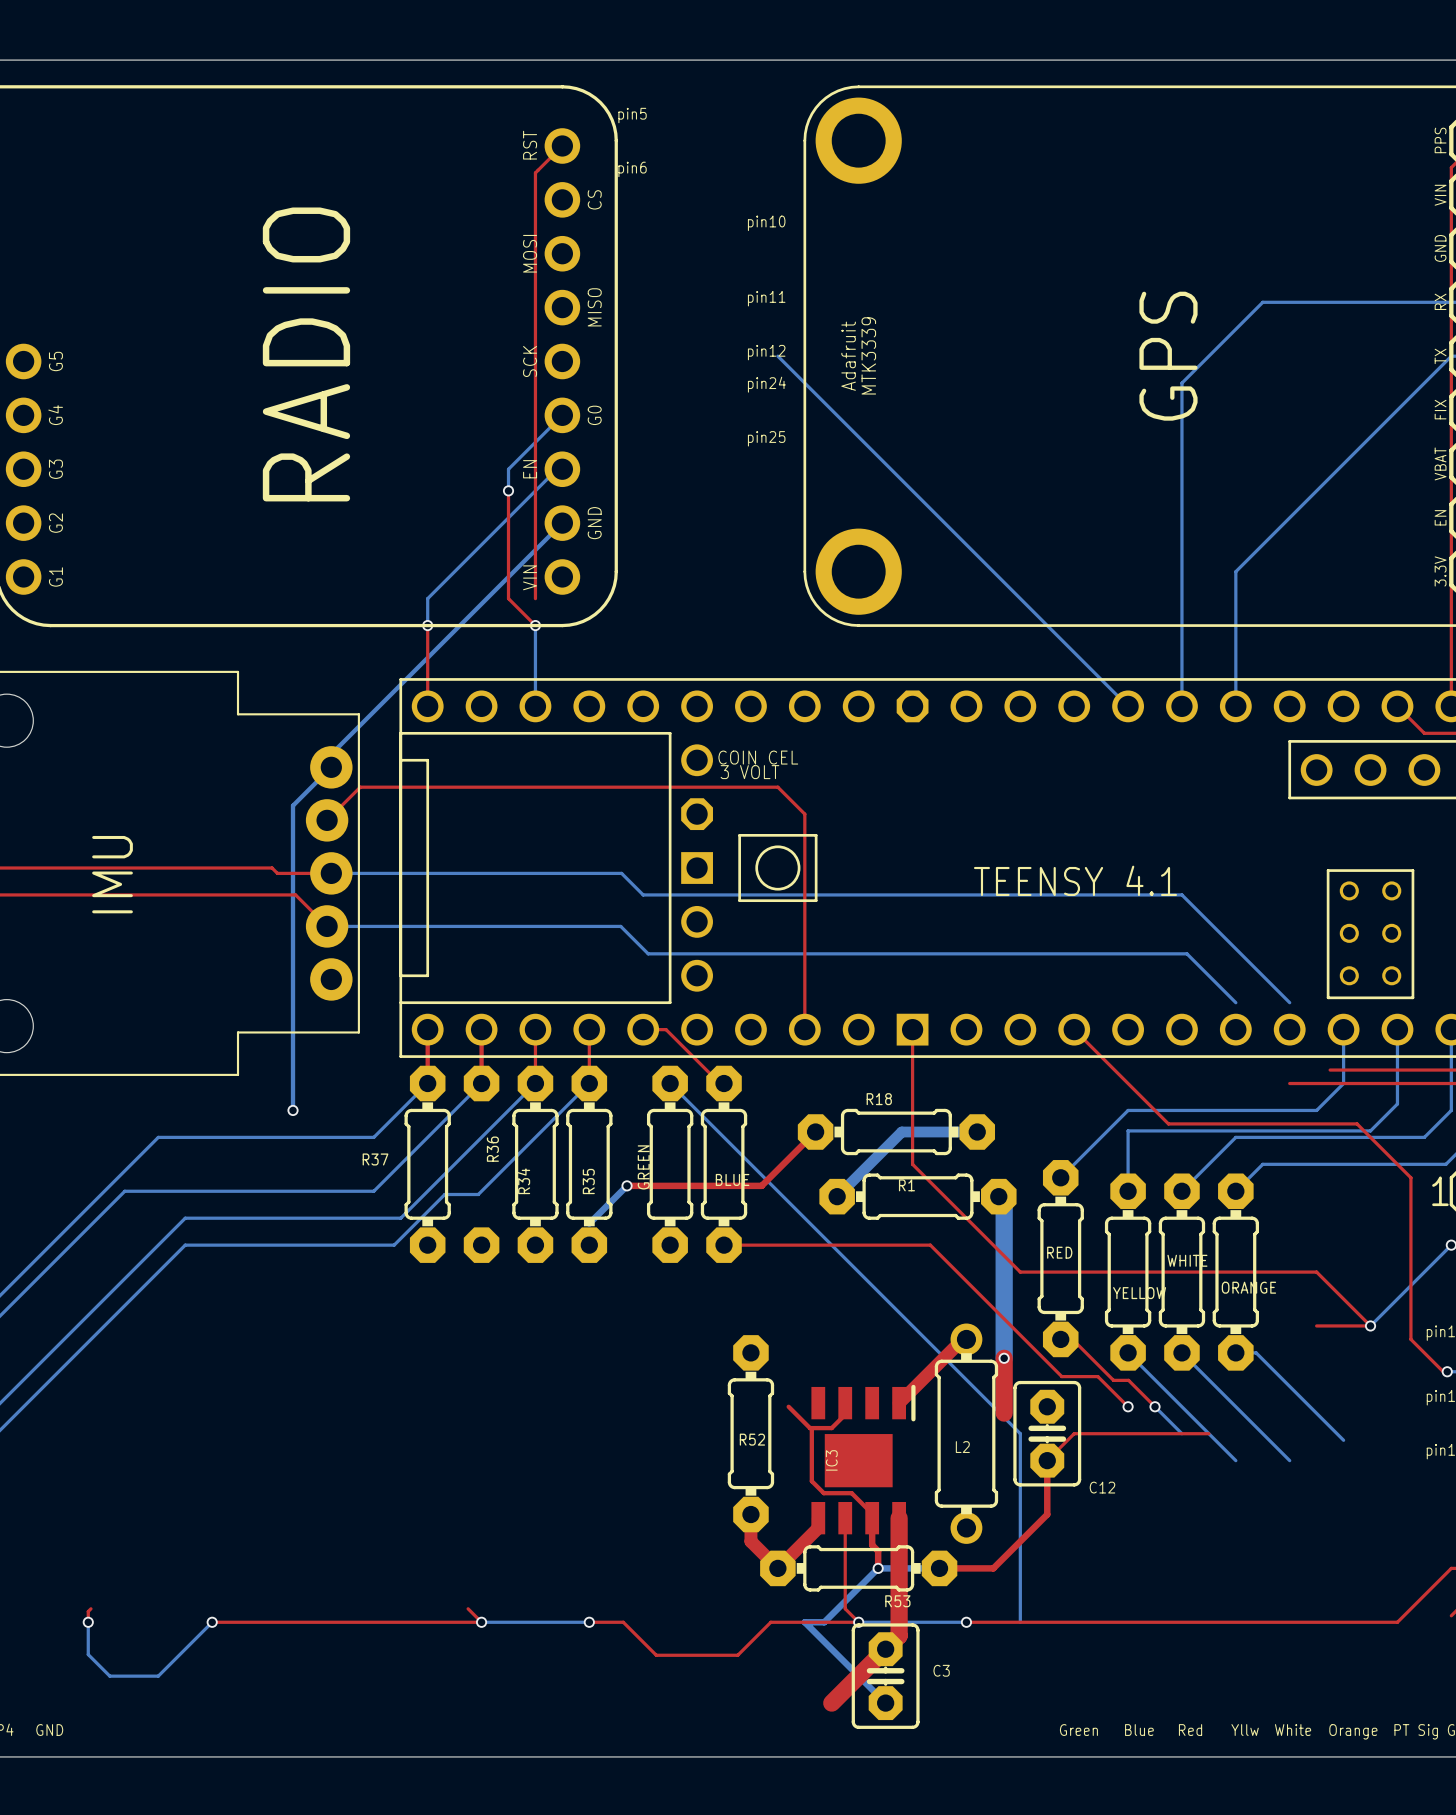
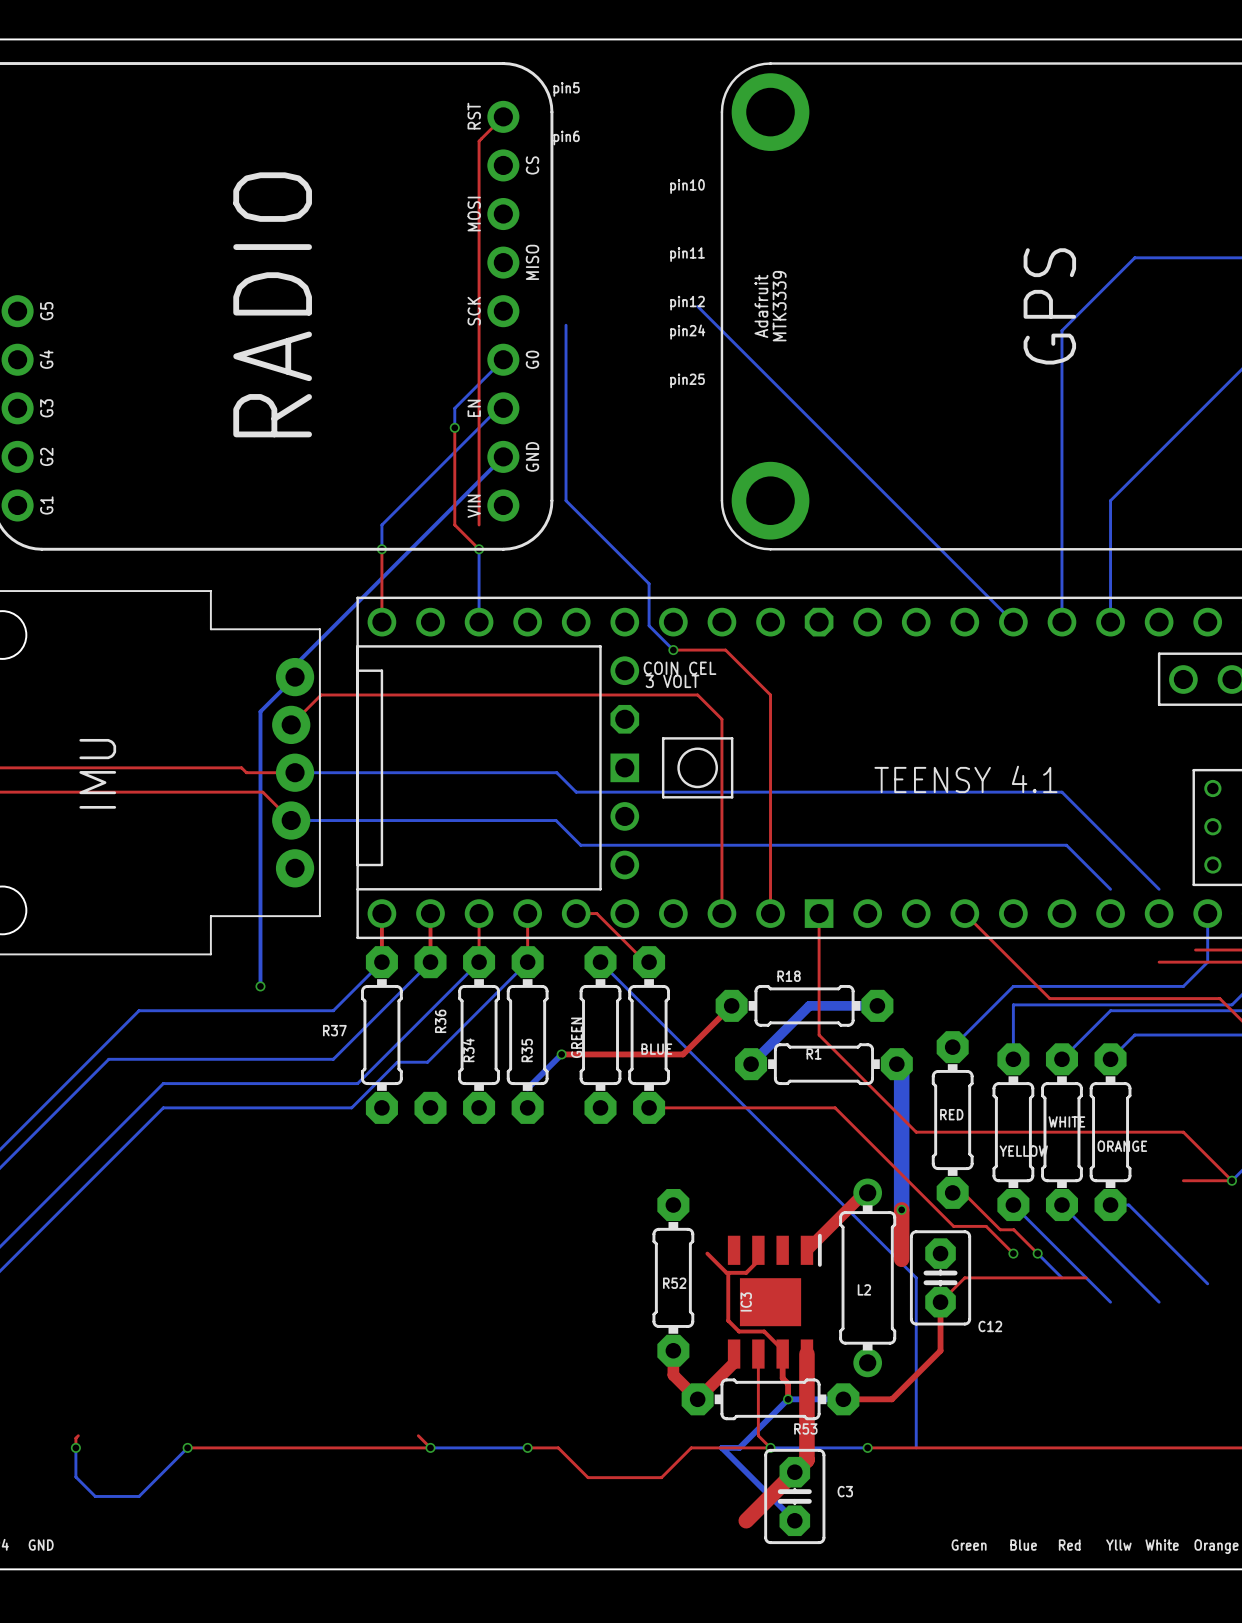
bottom track: none -> (566, 325) (566, 500) (649, 583) (649, 625) (673, 650)
top track: none -> (673, 650) (725, 650) (770, 694) (770, 913)
via: none -> (673, 650)

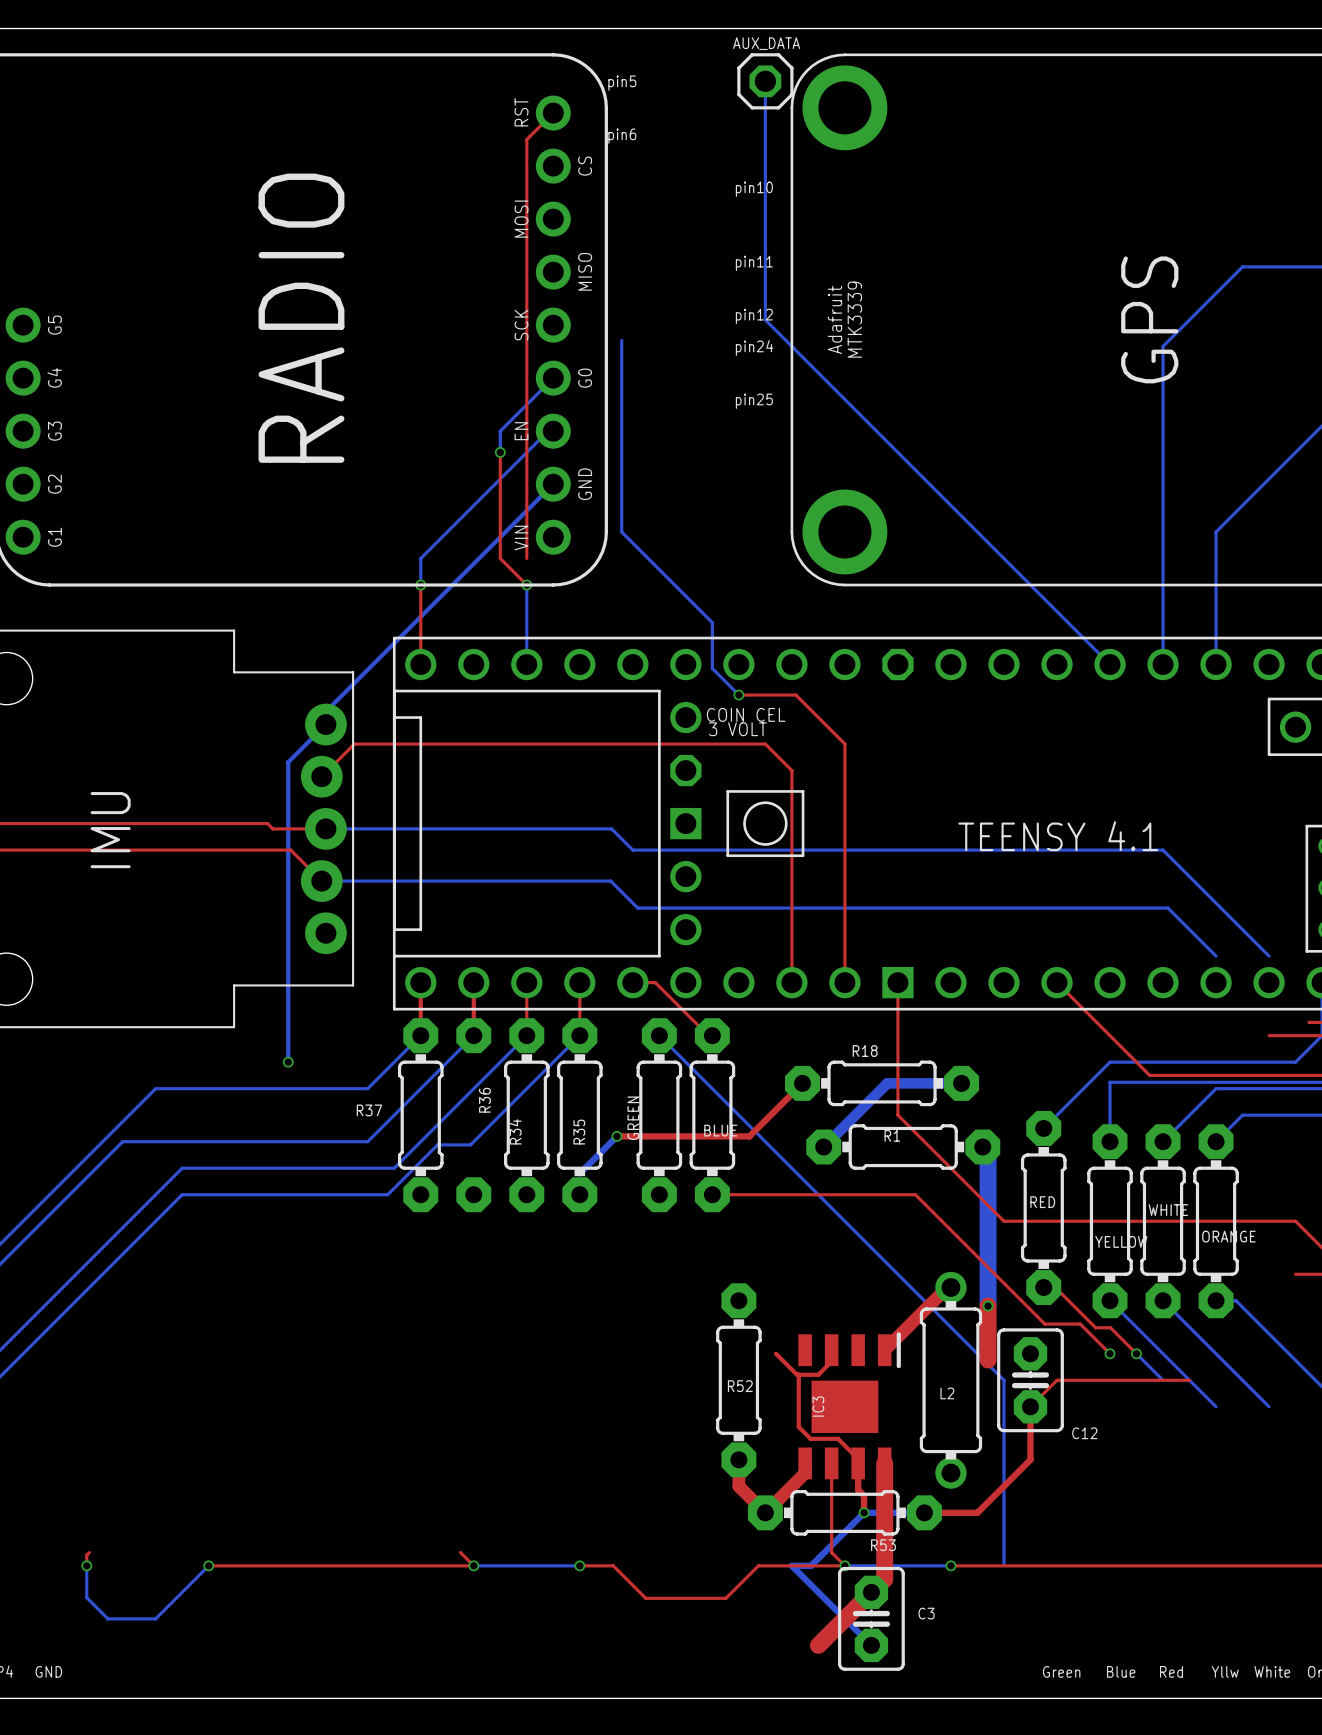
bottom track: none -> (765, 81) (765, 319)
AUX_DATA: none -> (765, 81)

